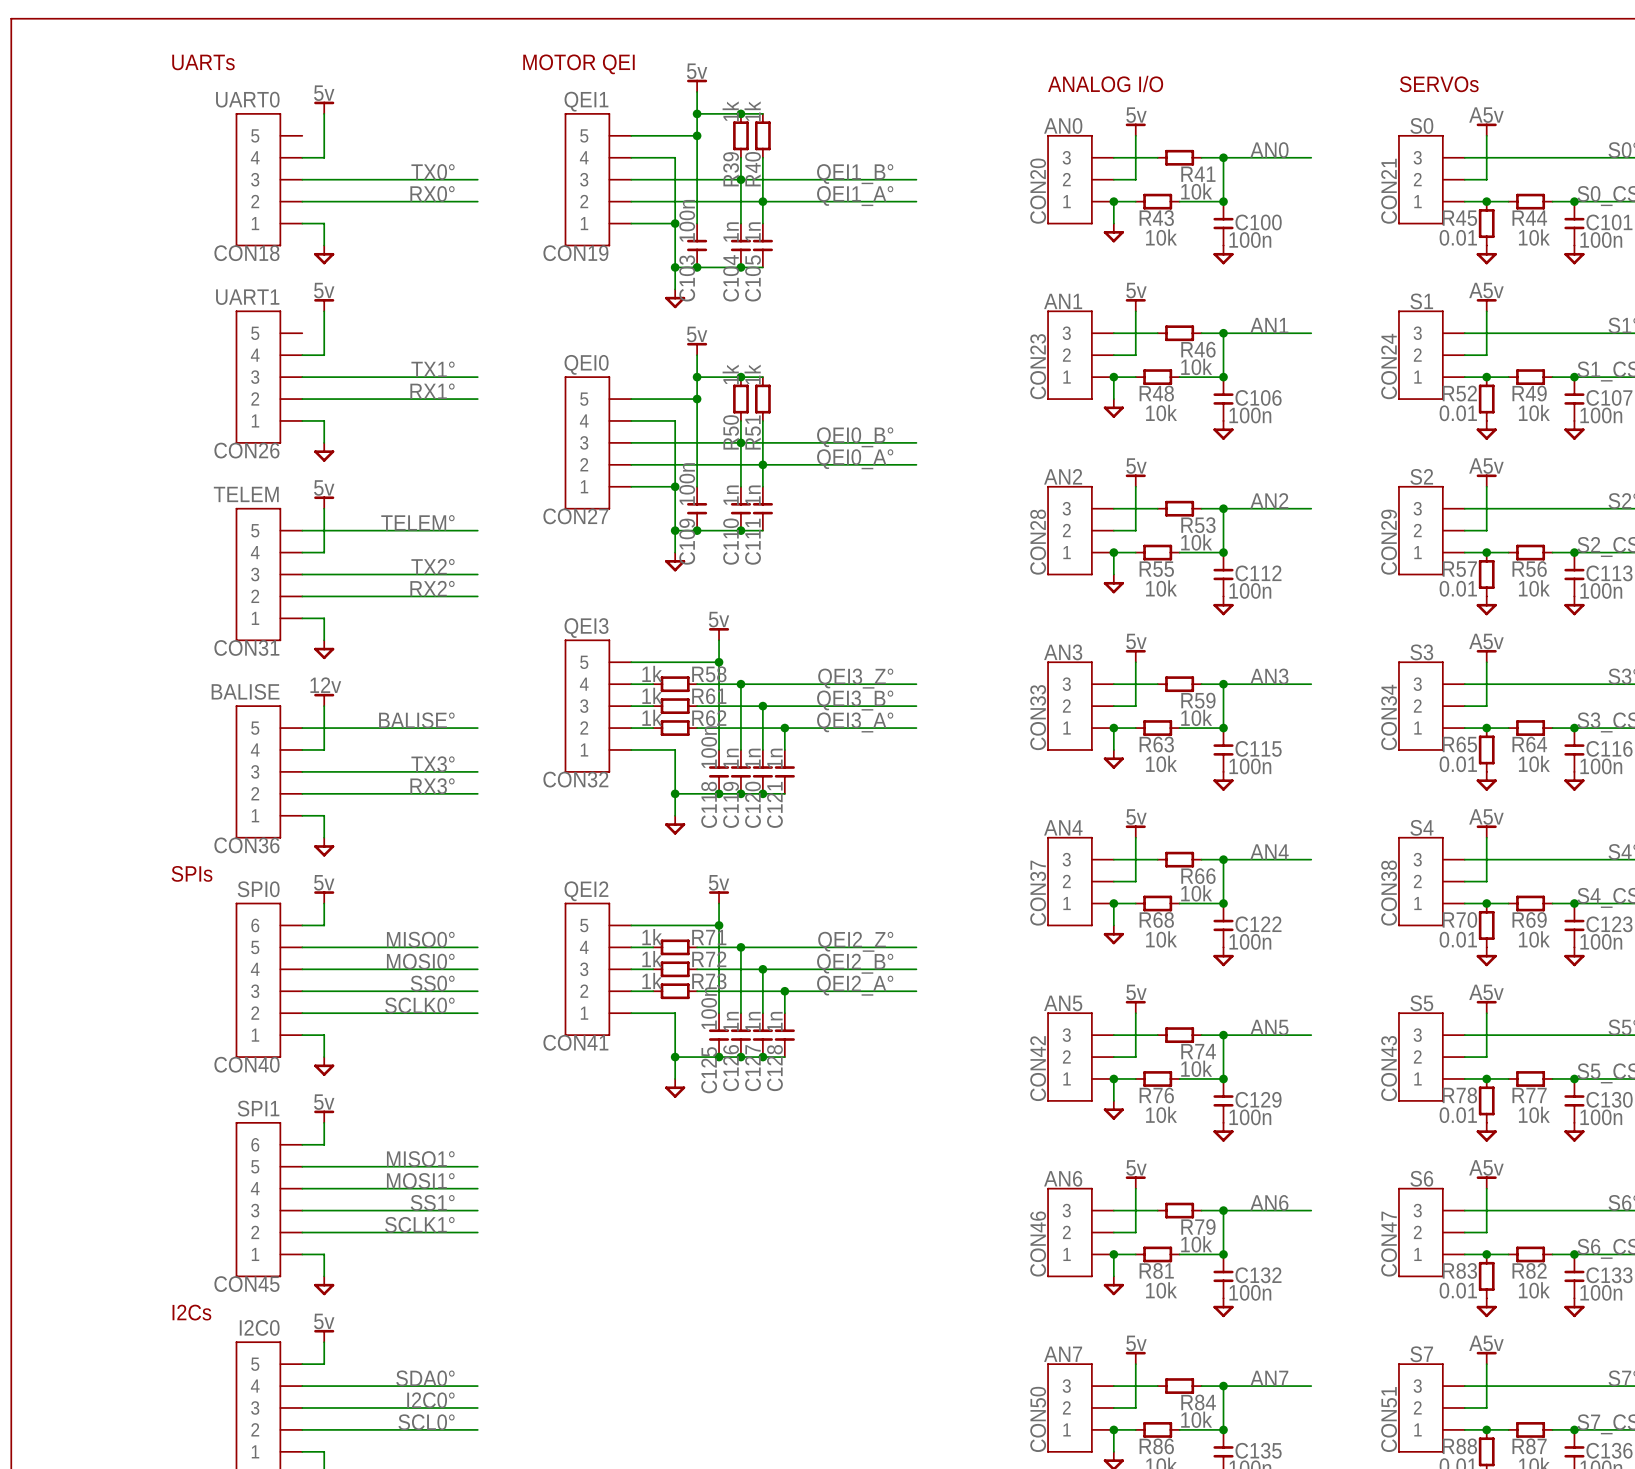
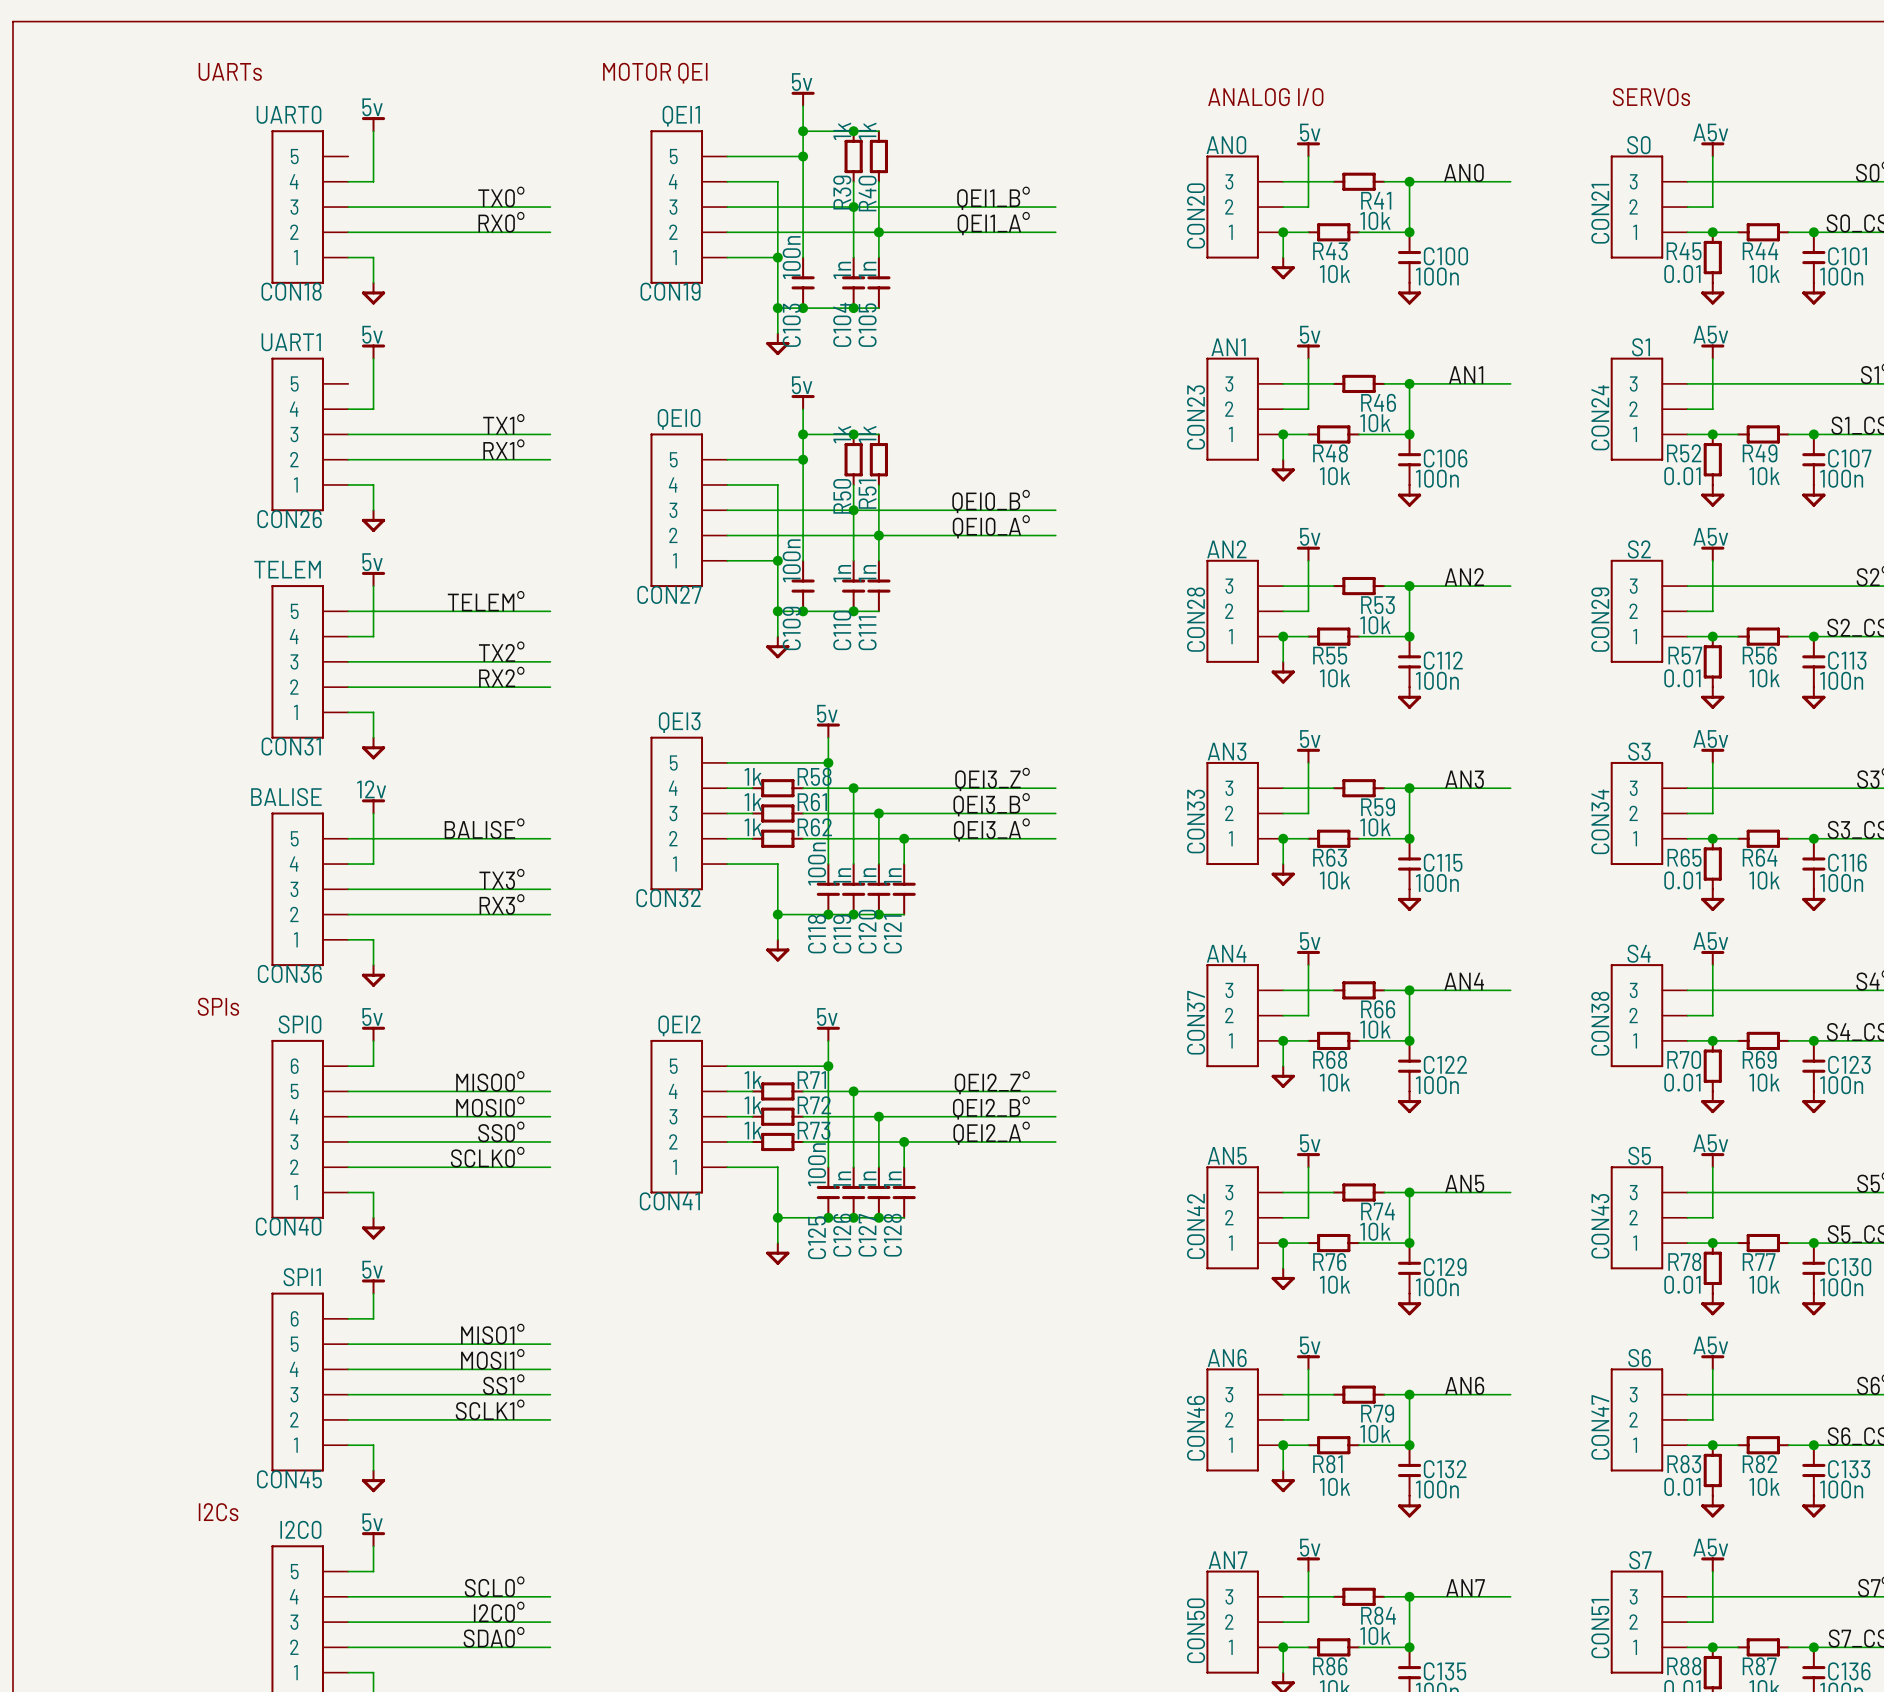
label: SDA0° (425, 1378) -> SCL0° (494, 1586)
label: SCL0° (426, 1422) -> SDA0° (494, 1637)

